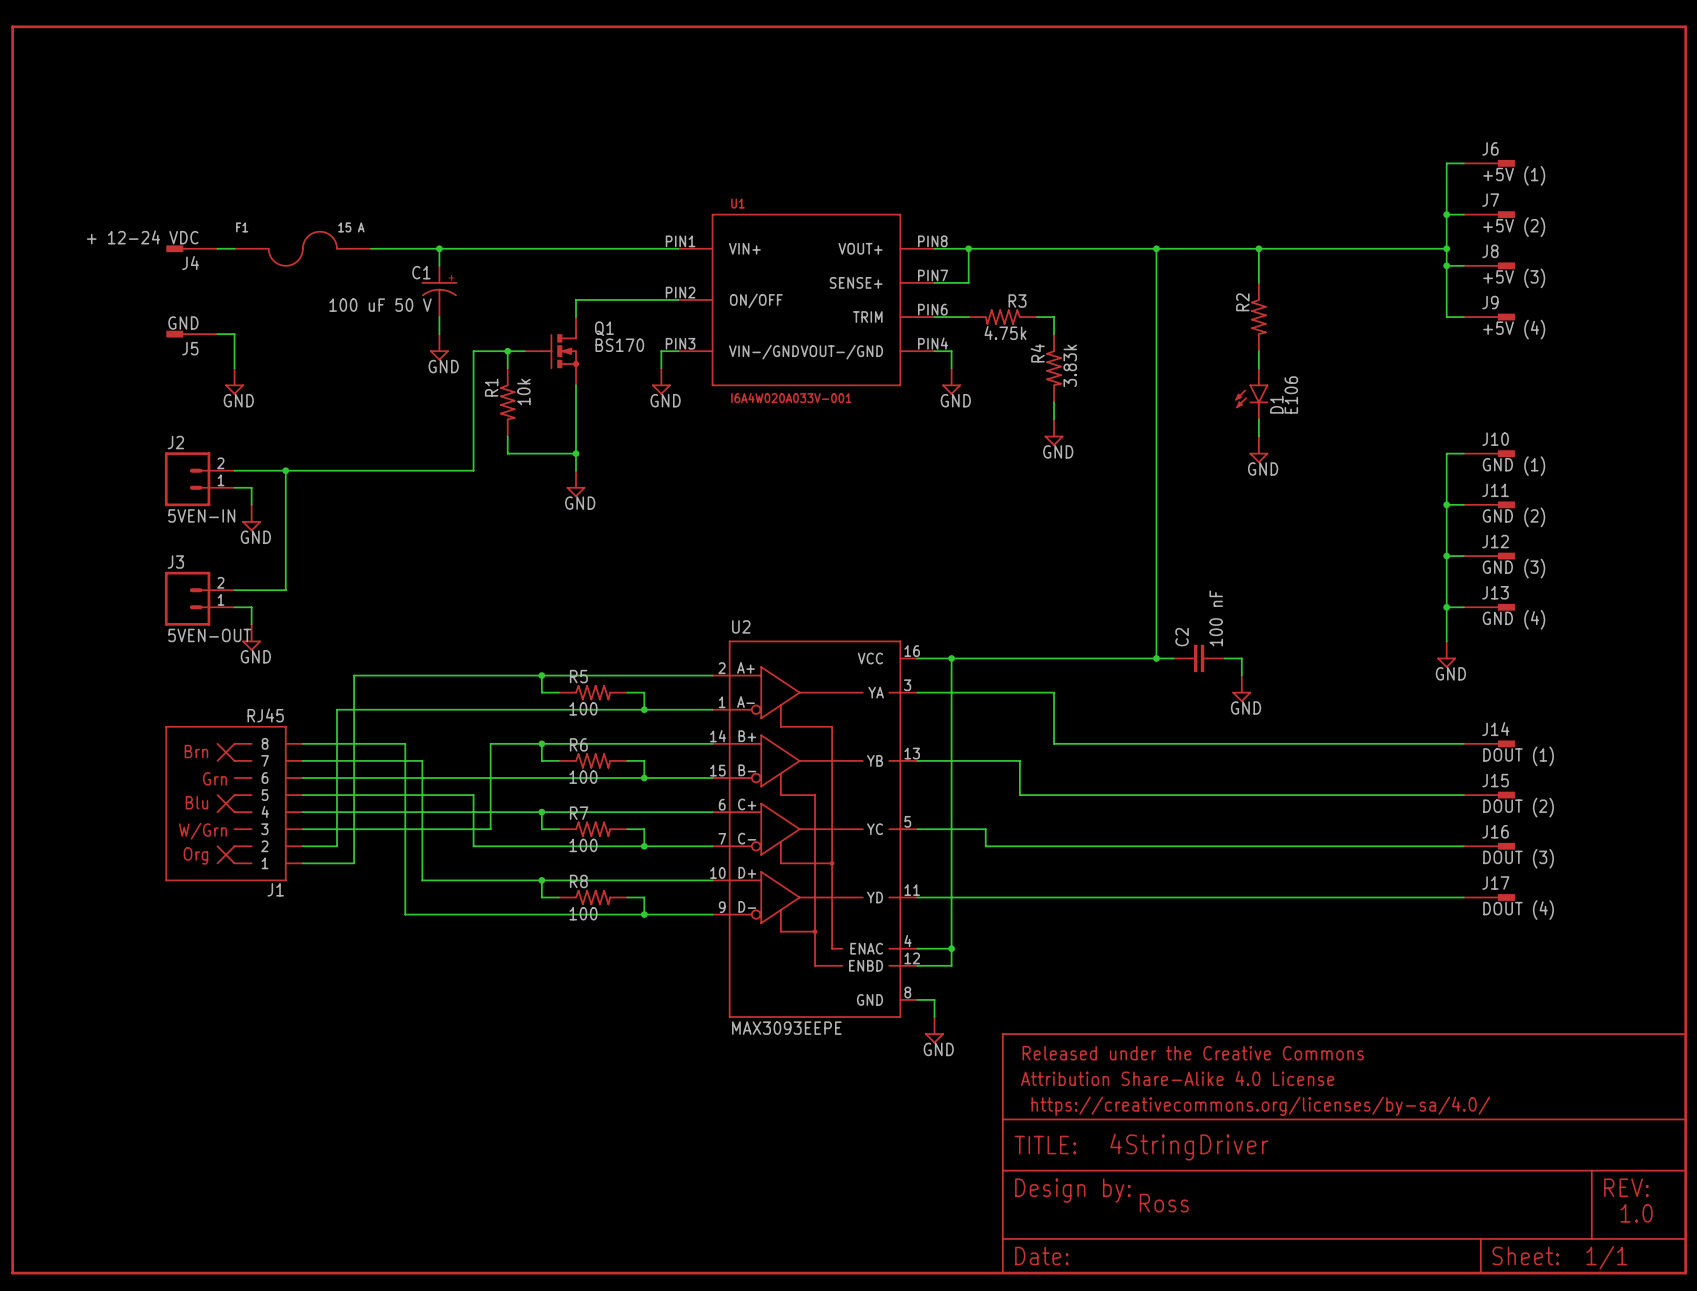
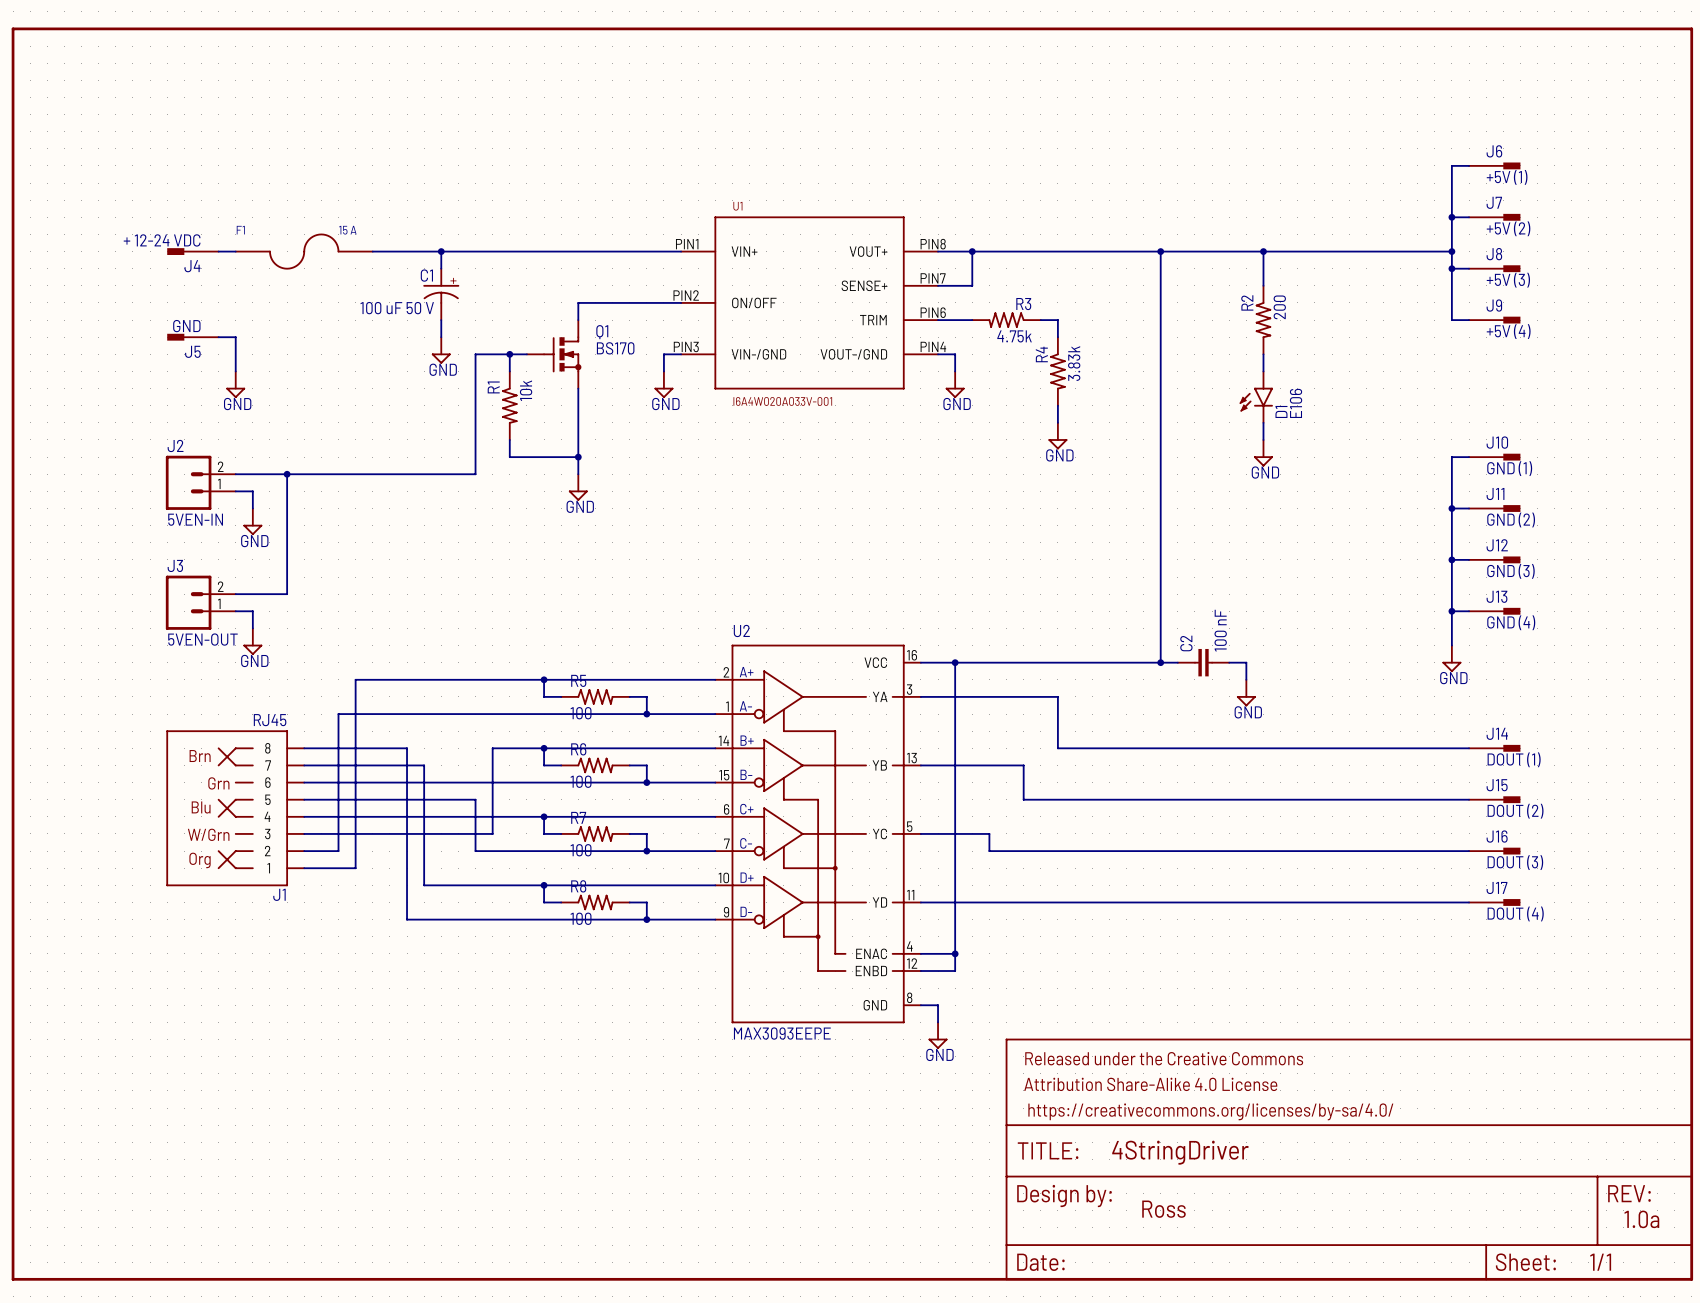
R2 value: none -> 200 (1279, 307)
text: 1.0 (1636, 1213) -> 1.0a (1641, 1219)

